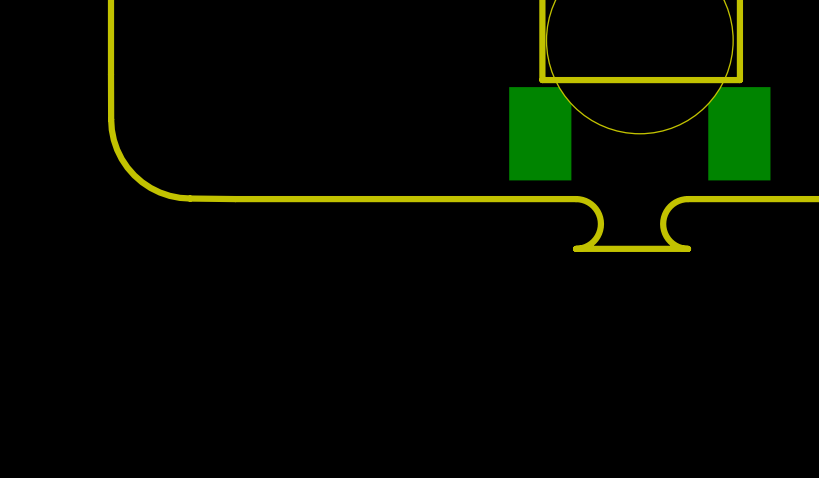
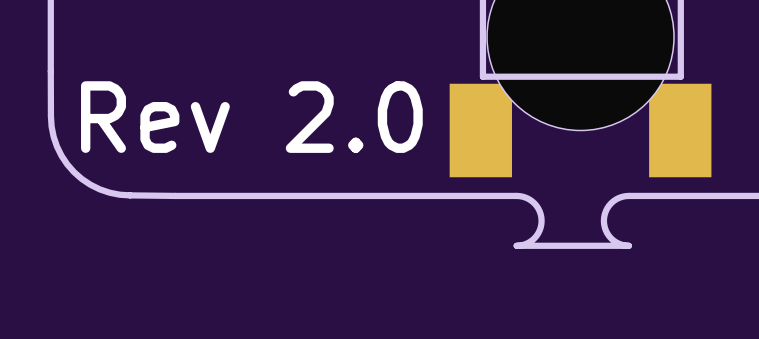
text: none -> Rev 2.0 (251, 117)

